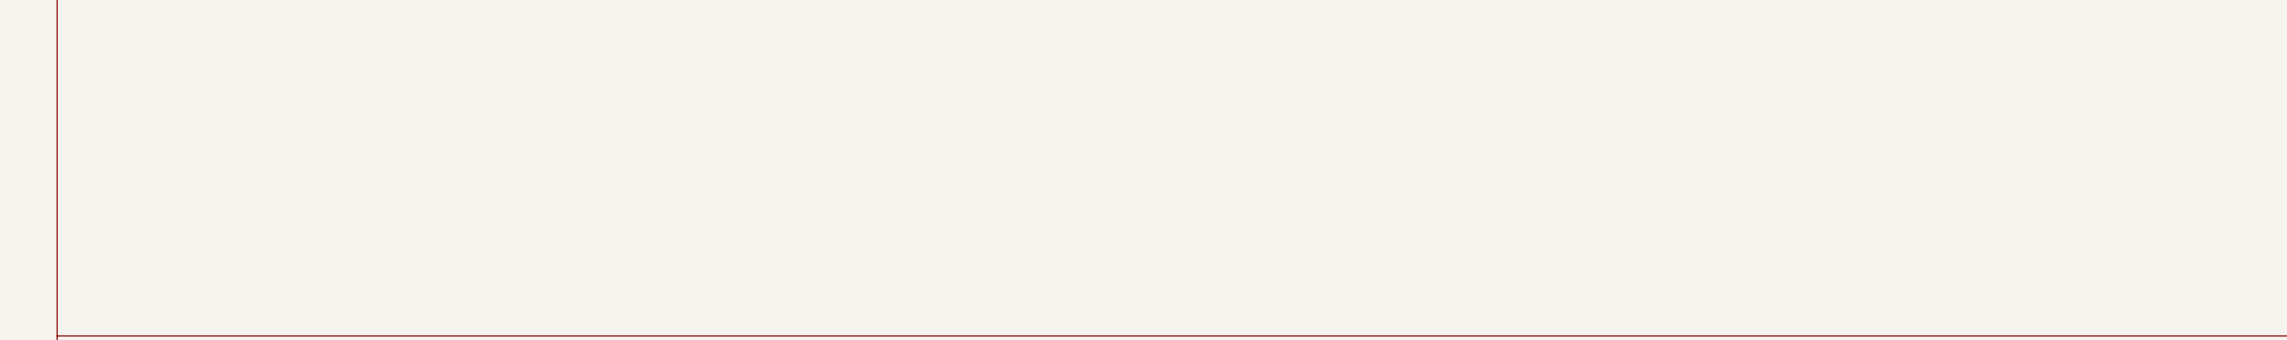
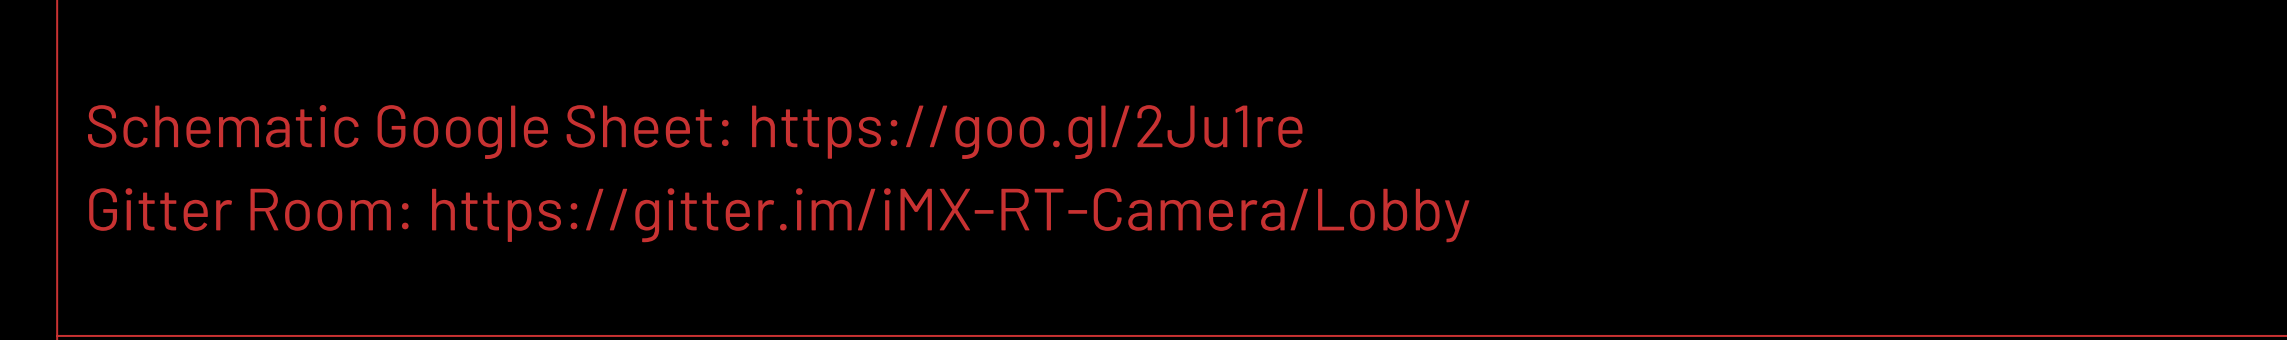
title block: none -> Schematic Google Sheet: https://goo.gl/2Ju1re (695, 132)
title block: none -> Gitter Room: https://gitter.im/iMX-RT-Camera/Lobby (779, 215)

